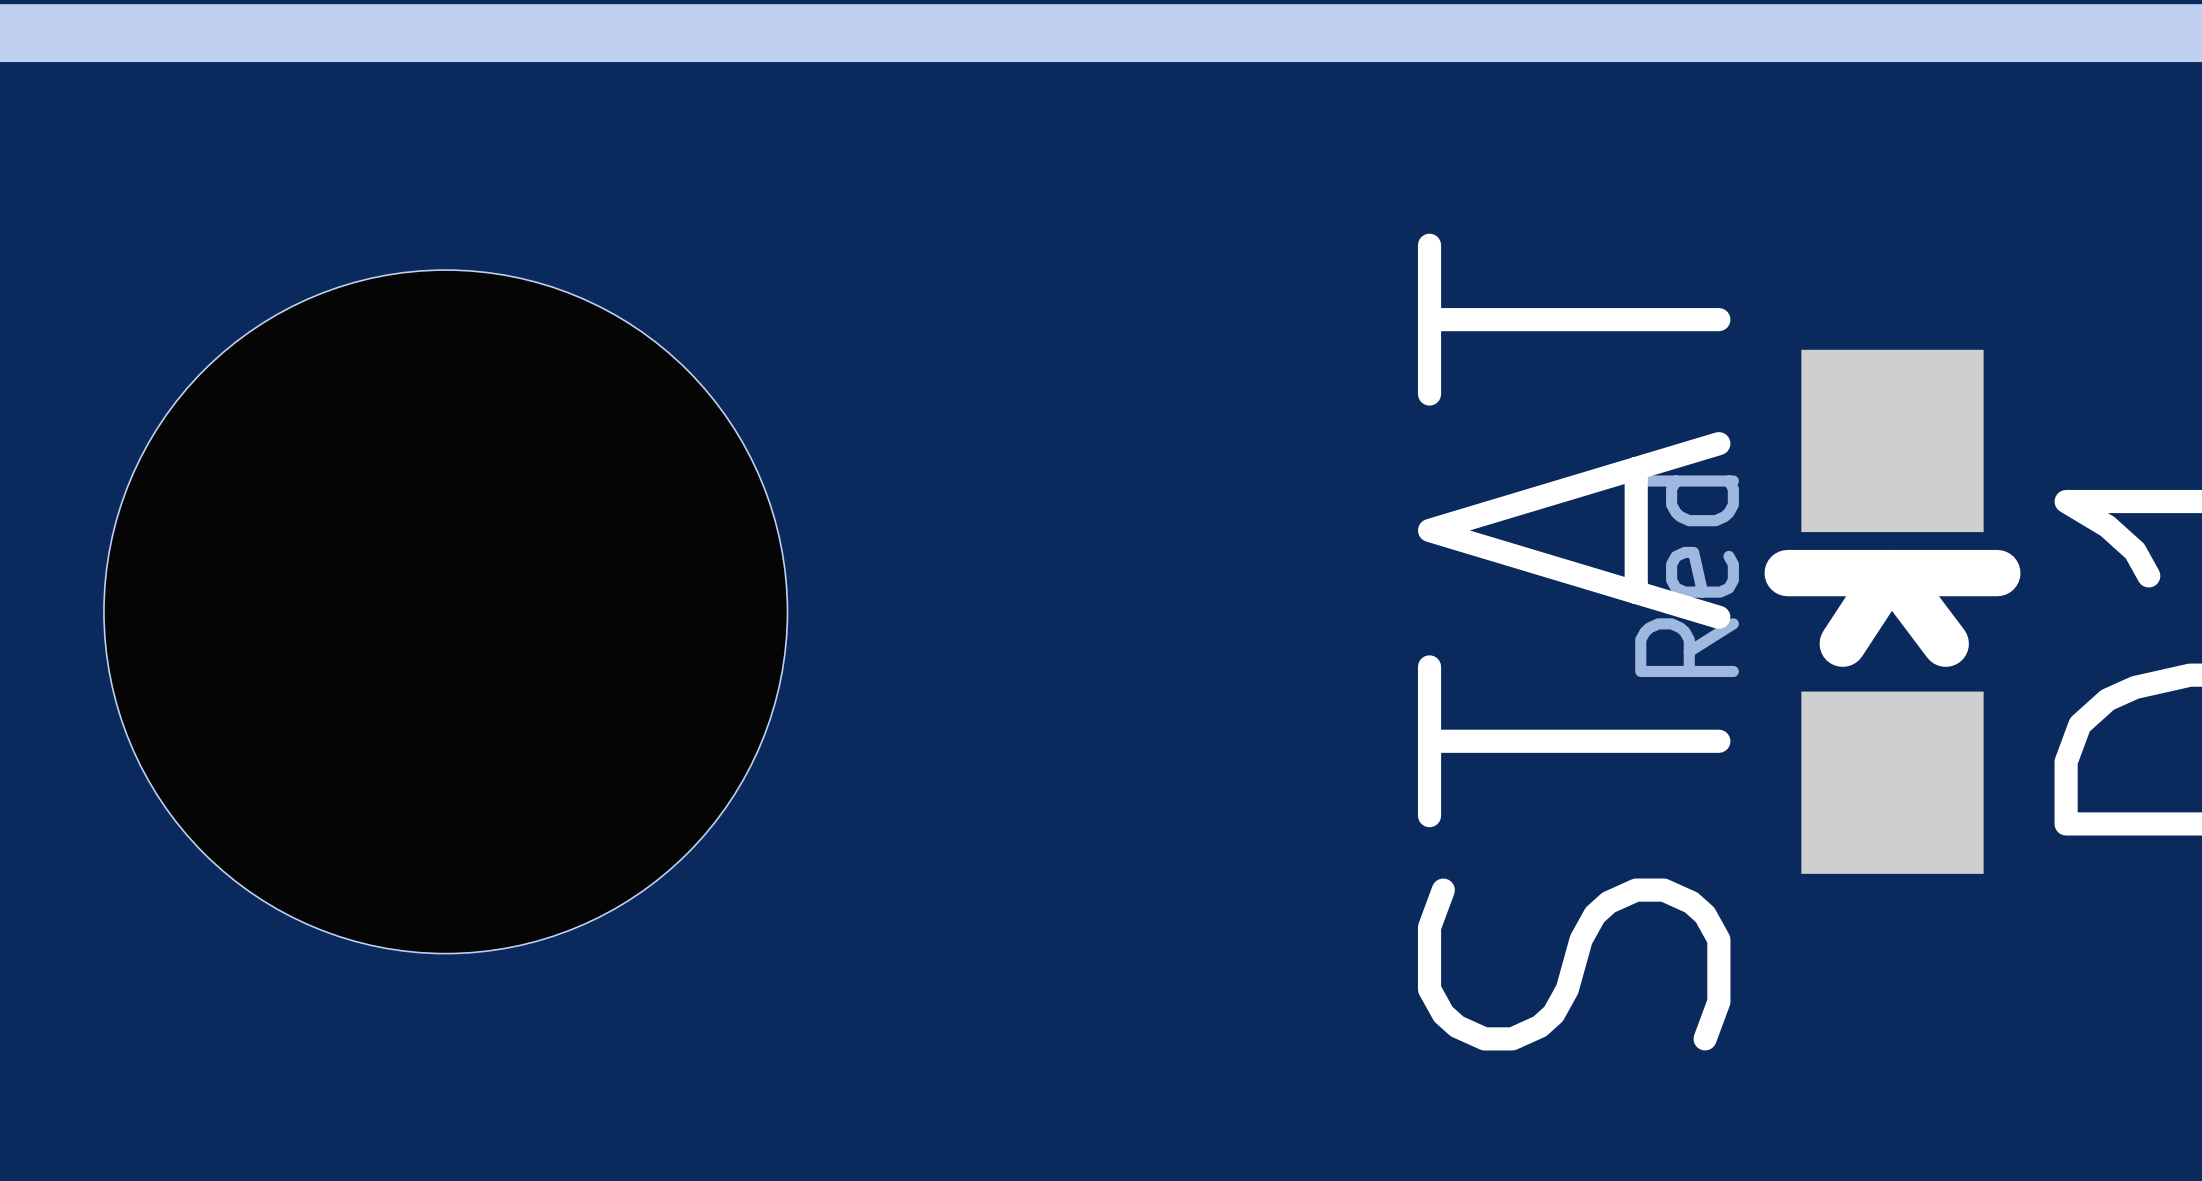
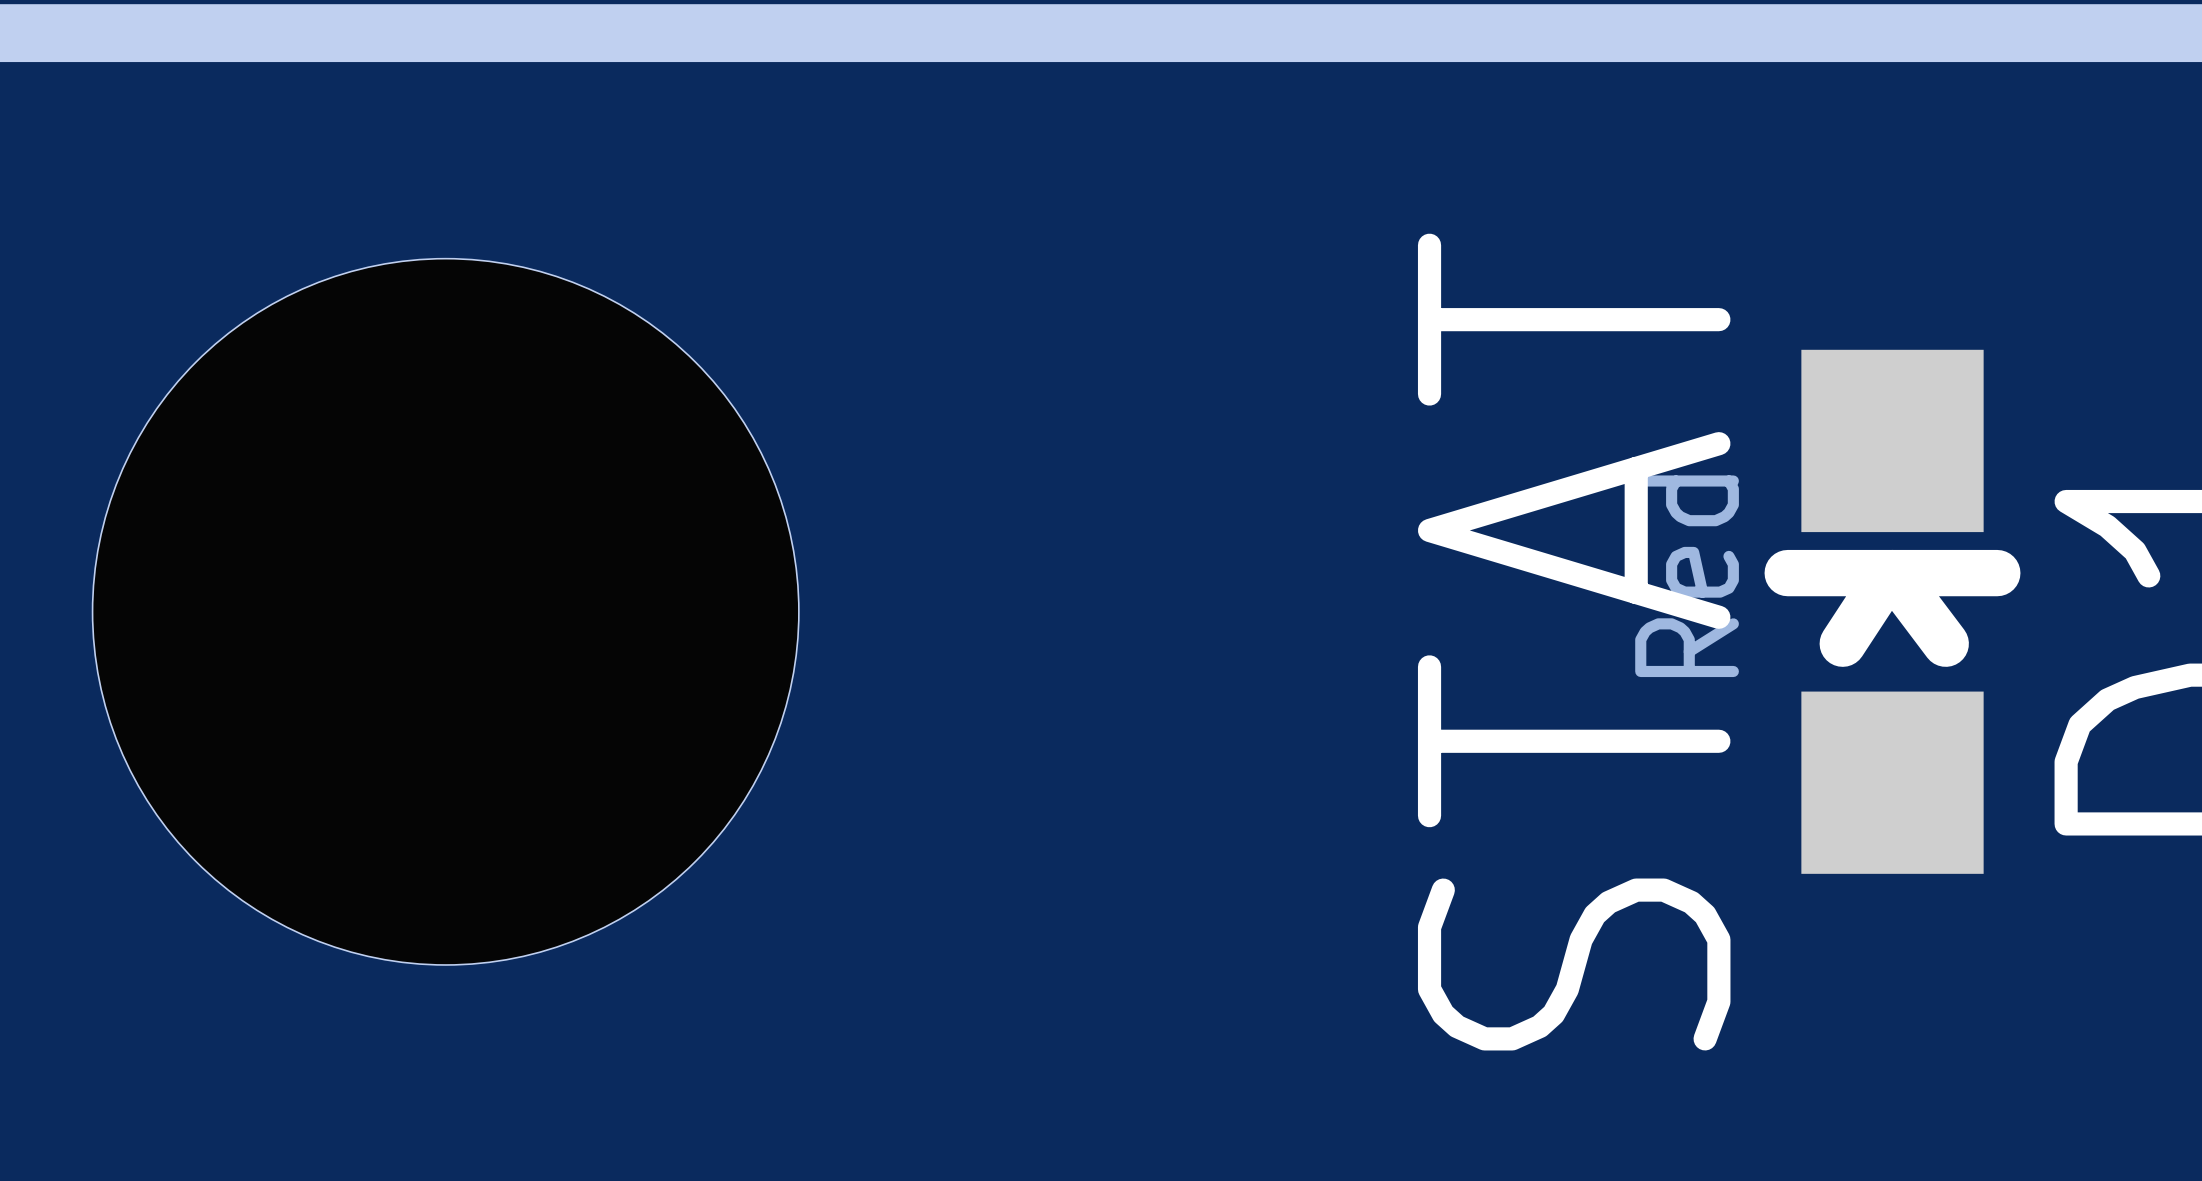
hole size: [103, 270, 788, 954] -> [92, 258, 799, 965]

